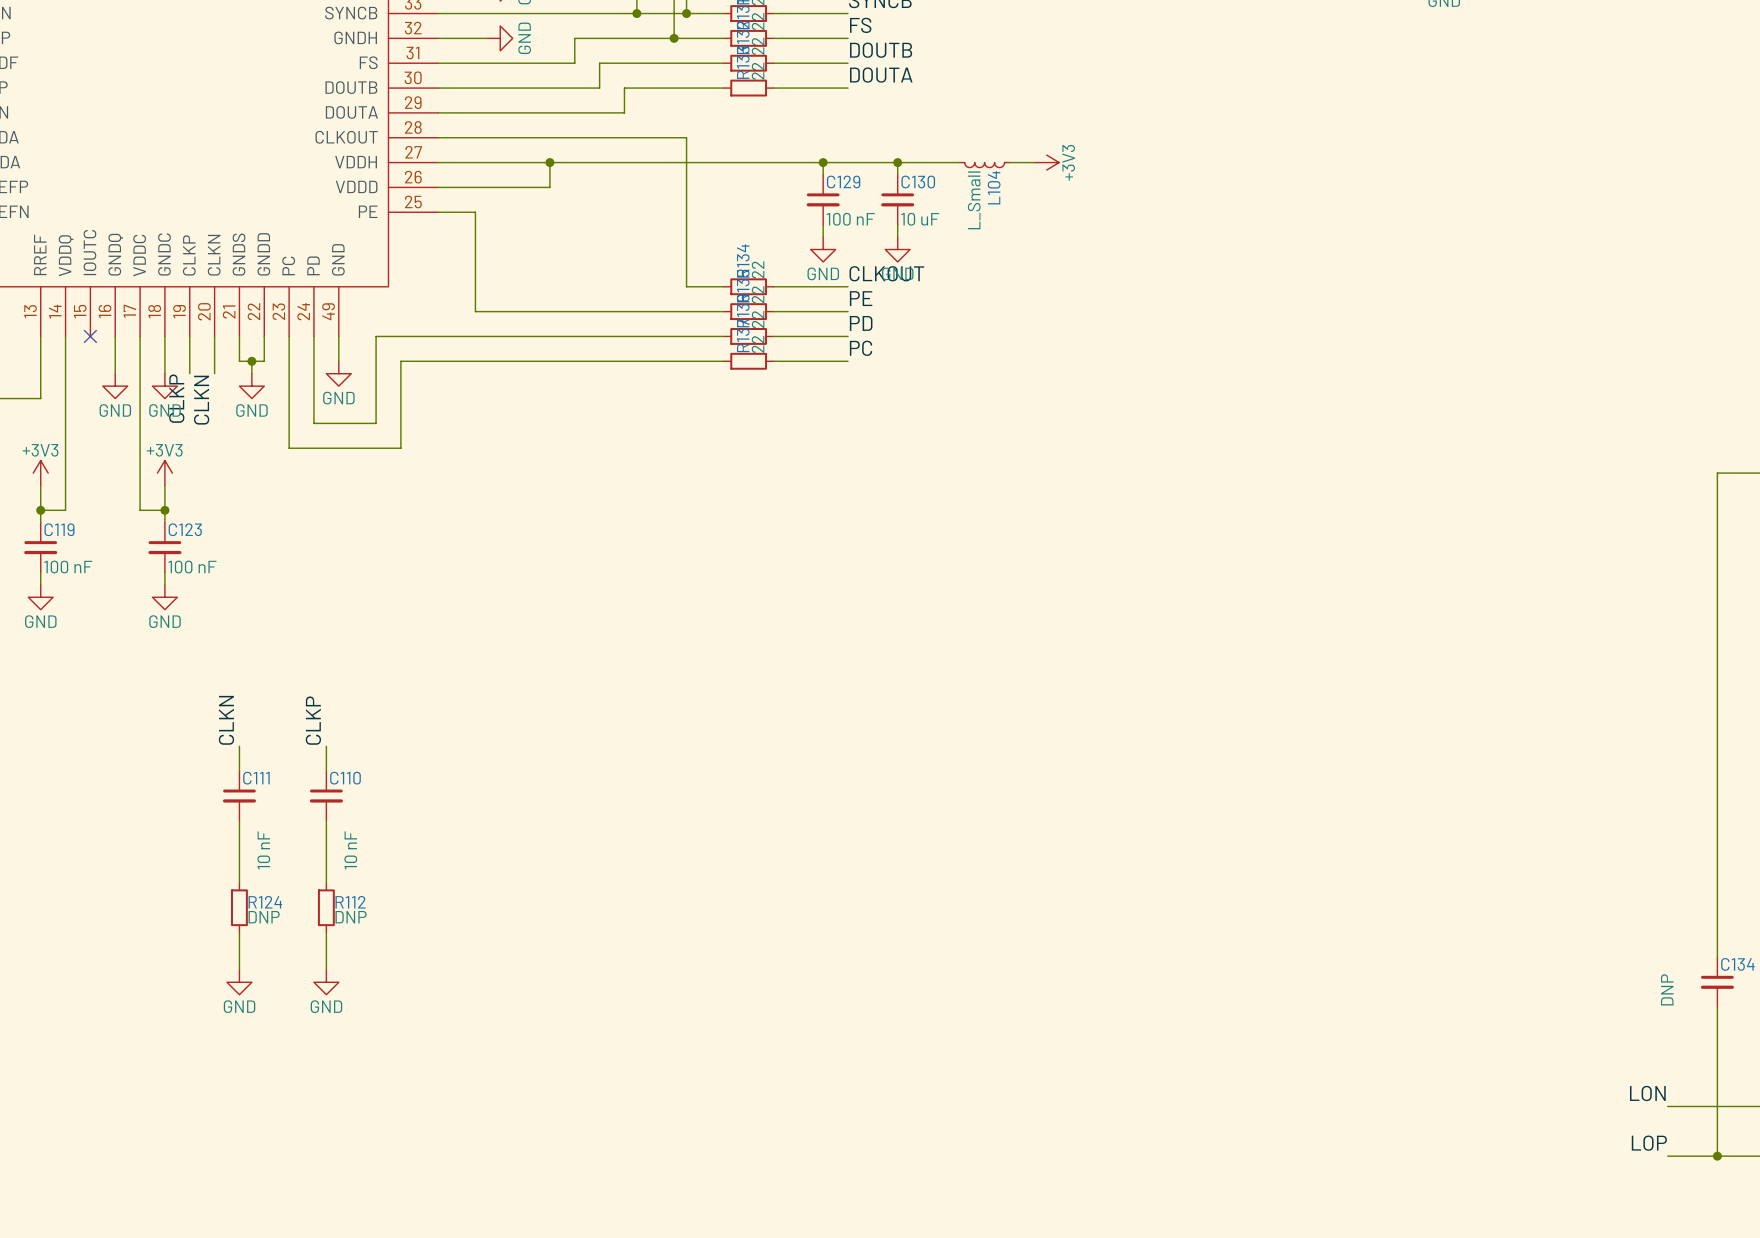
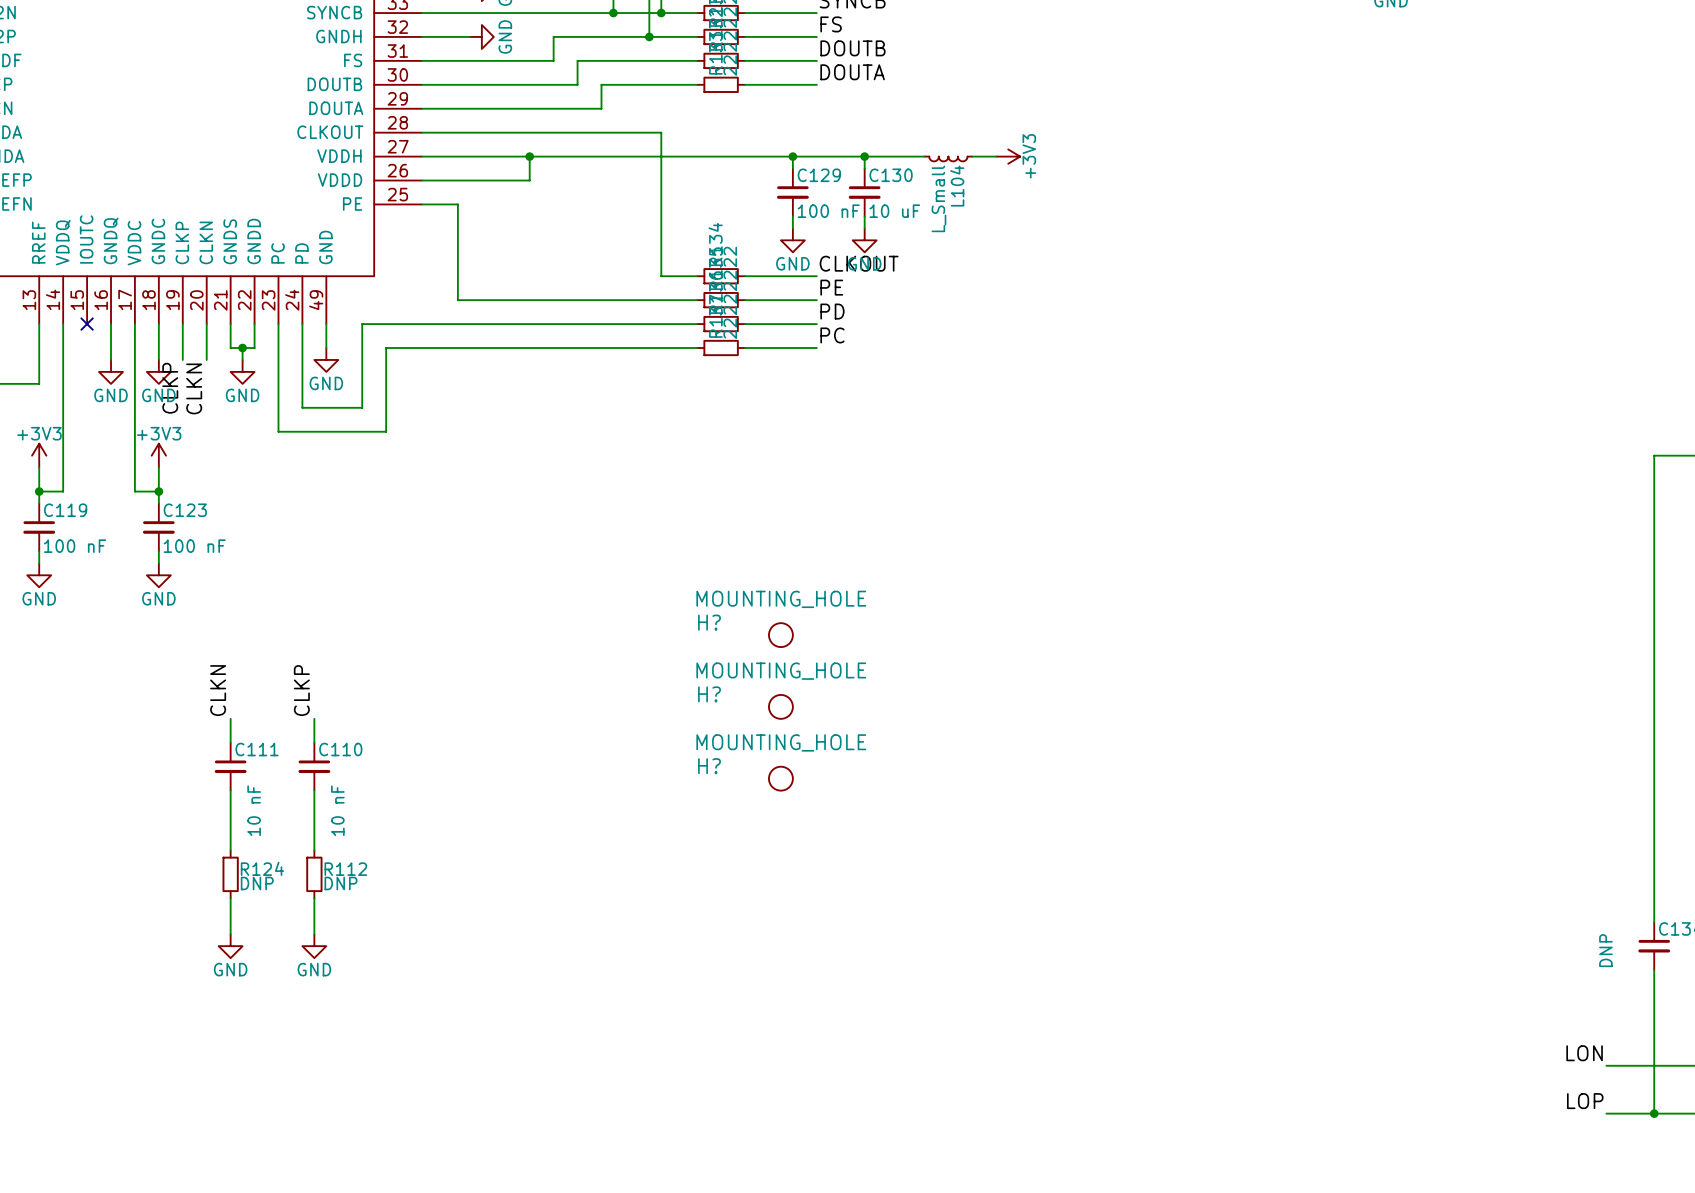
H?: none -> MOUNTING_HOLE (780, 635)
H?: none -> MOUNTING_HOLE (780, 706)
H?: none -> MOUNTING_HOLE (780, 778)

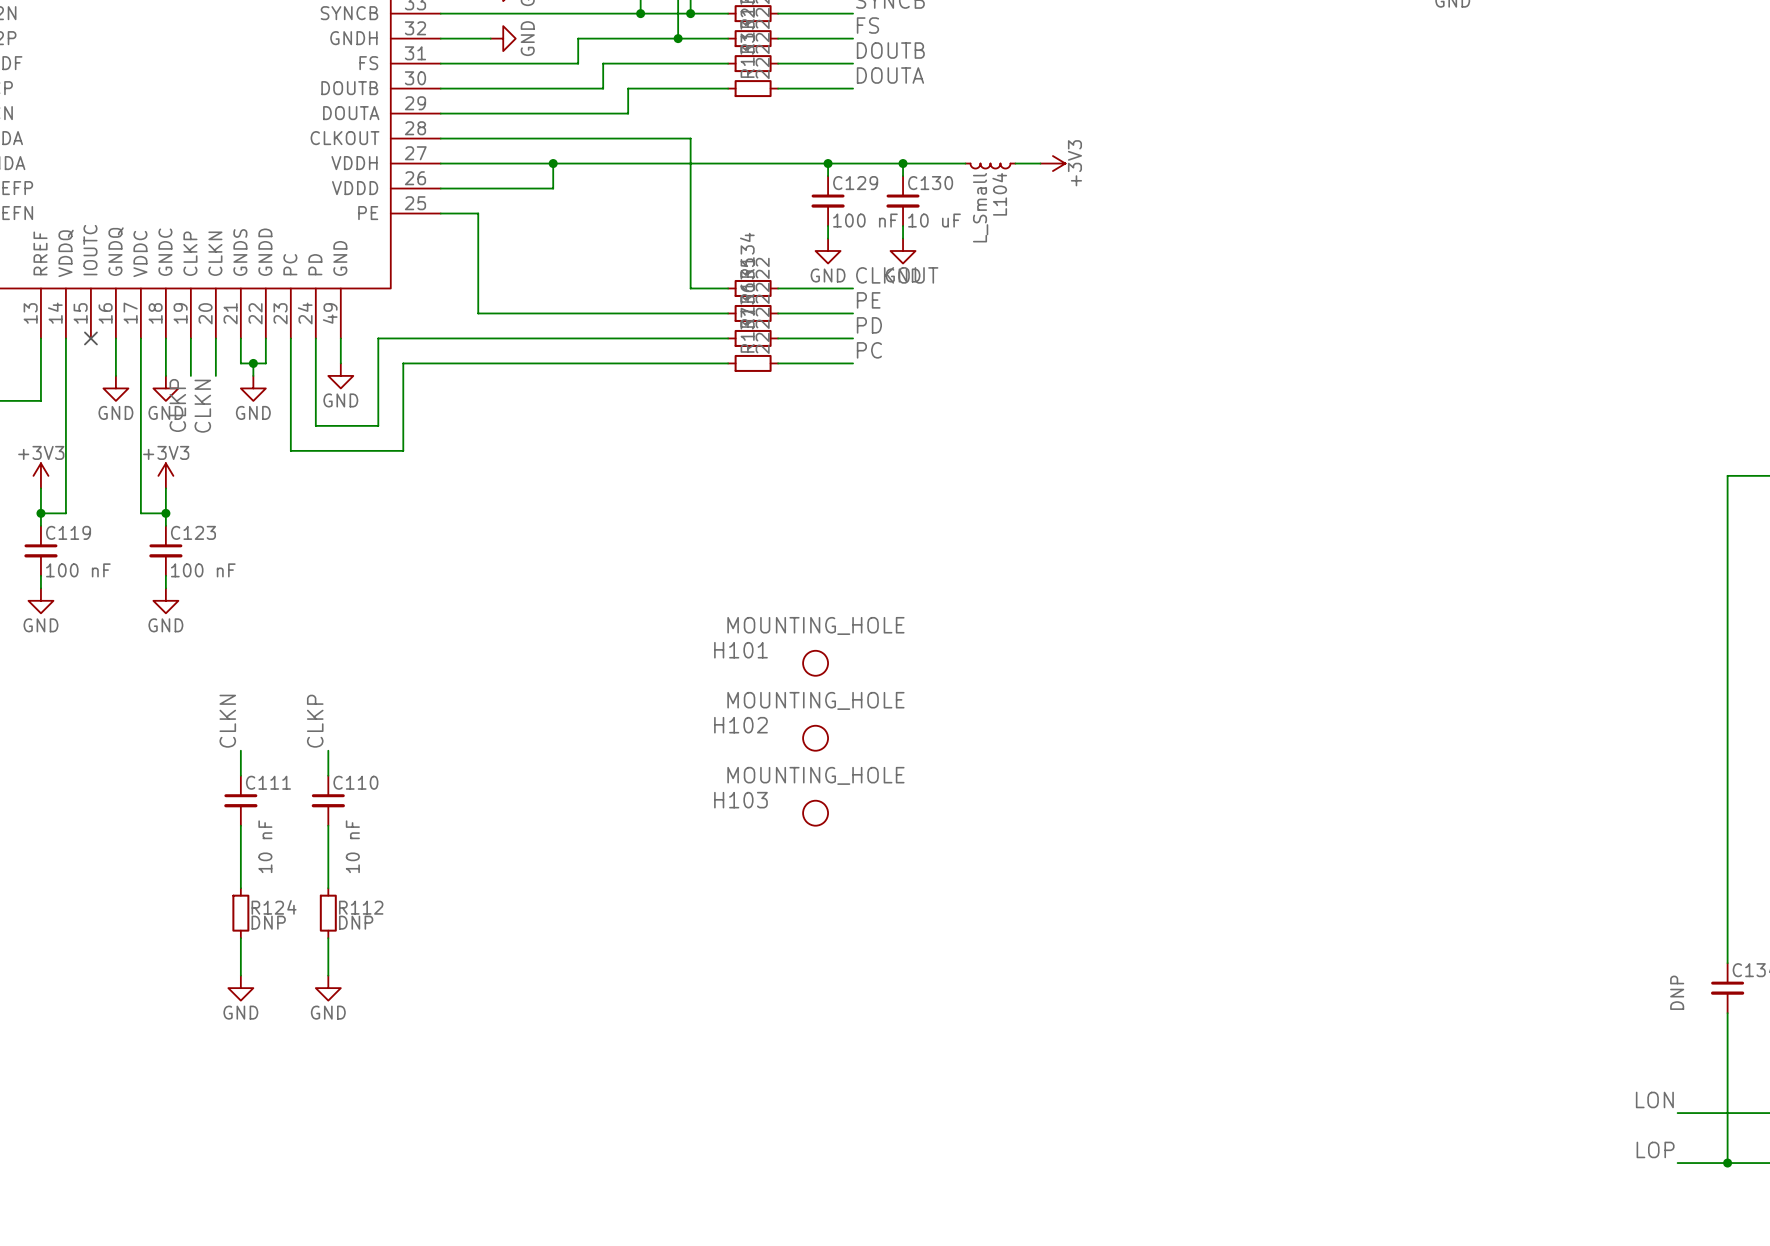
H? name: H? (709, 622) -> H101 (740, 650)
H? name: H? (709, 694) -> H102 (740, 725)
H? name: H? (709, 766) -> H103 (740, 800)

